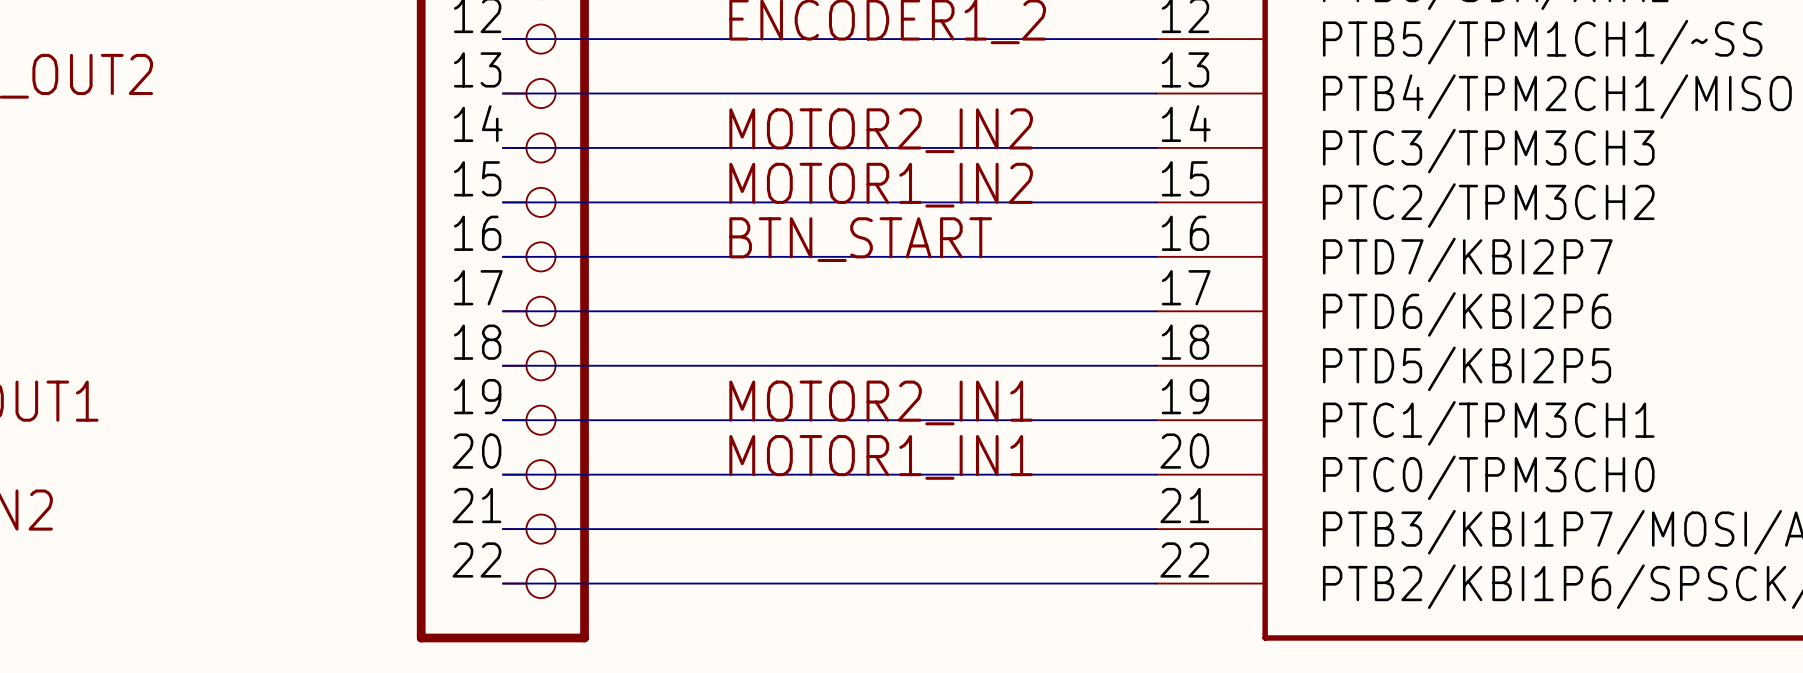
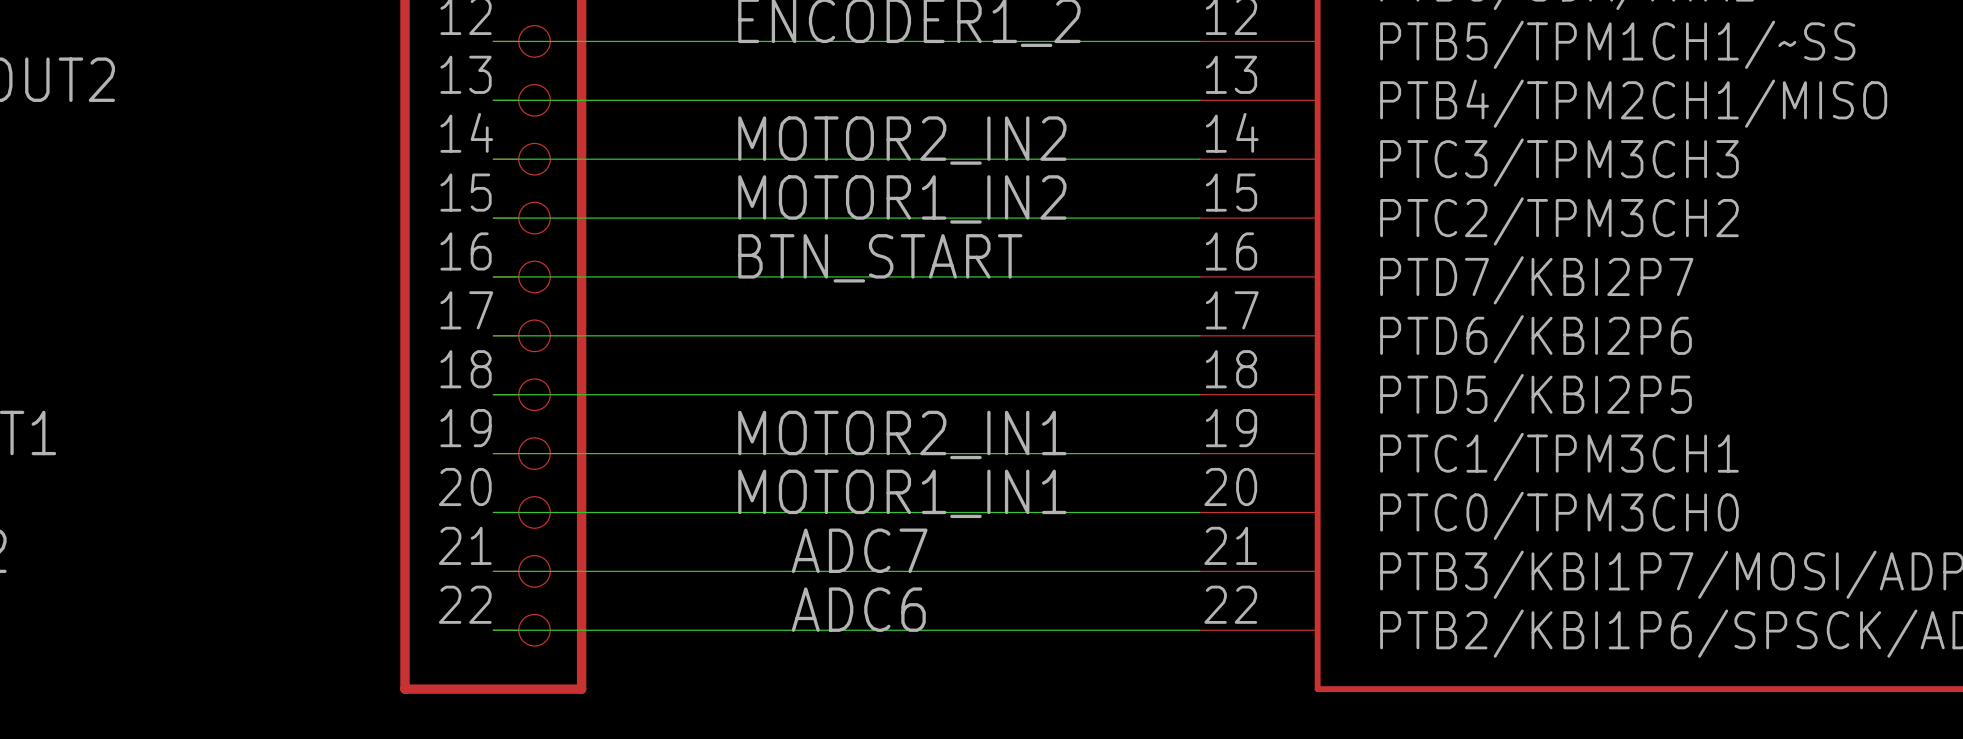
label: none -> ADC7 (859, 550)
label: none -> ADC6 (858, 609)

